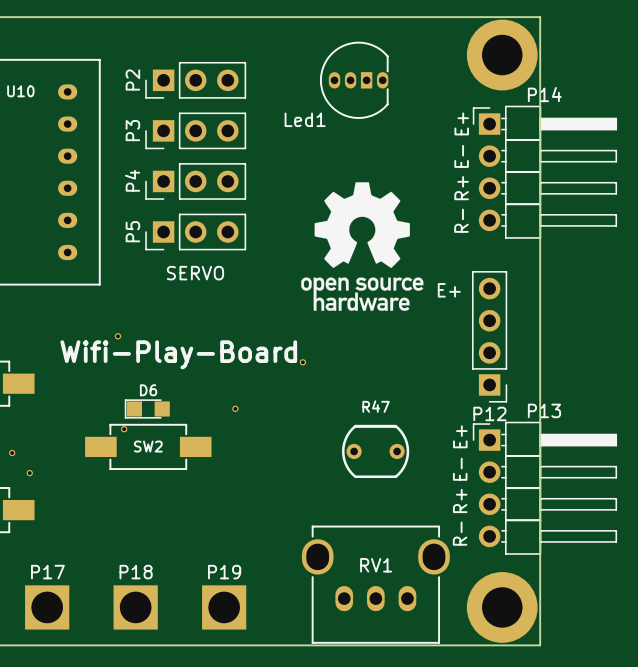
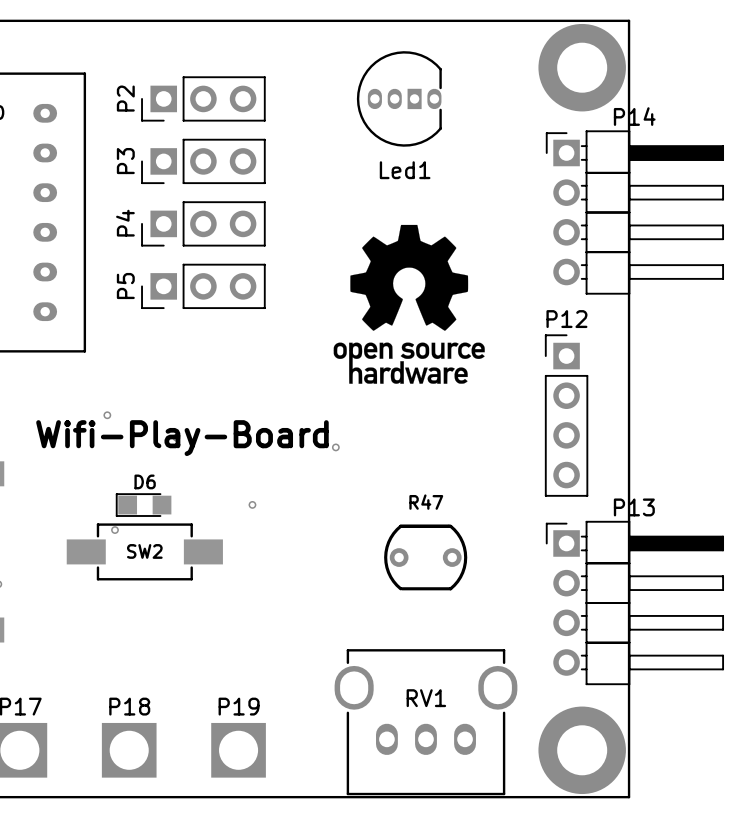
Led1 name position: Led1 (305, 119) -> Led1 (405, 170)
text: E+ (461, 123) -> none
text: E- (461, 156) -> none
text: R+ (461, 188) -> none
text: R- (461, 220) -> none
text: SERVO (195, 273) -> none
text: E+ (449, 290) -> none
P12 rotation: 0° (489, 336) -> 180° (566, 415)
text: E+ (460, 436) -> none
text: E- (460, 469) -> none
text: R+ (460, 501) -> none
text: R- (460, 533) -> none

